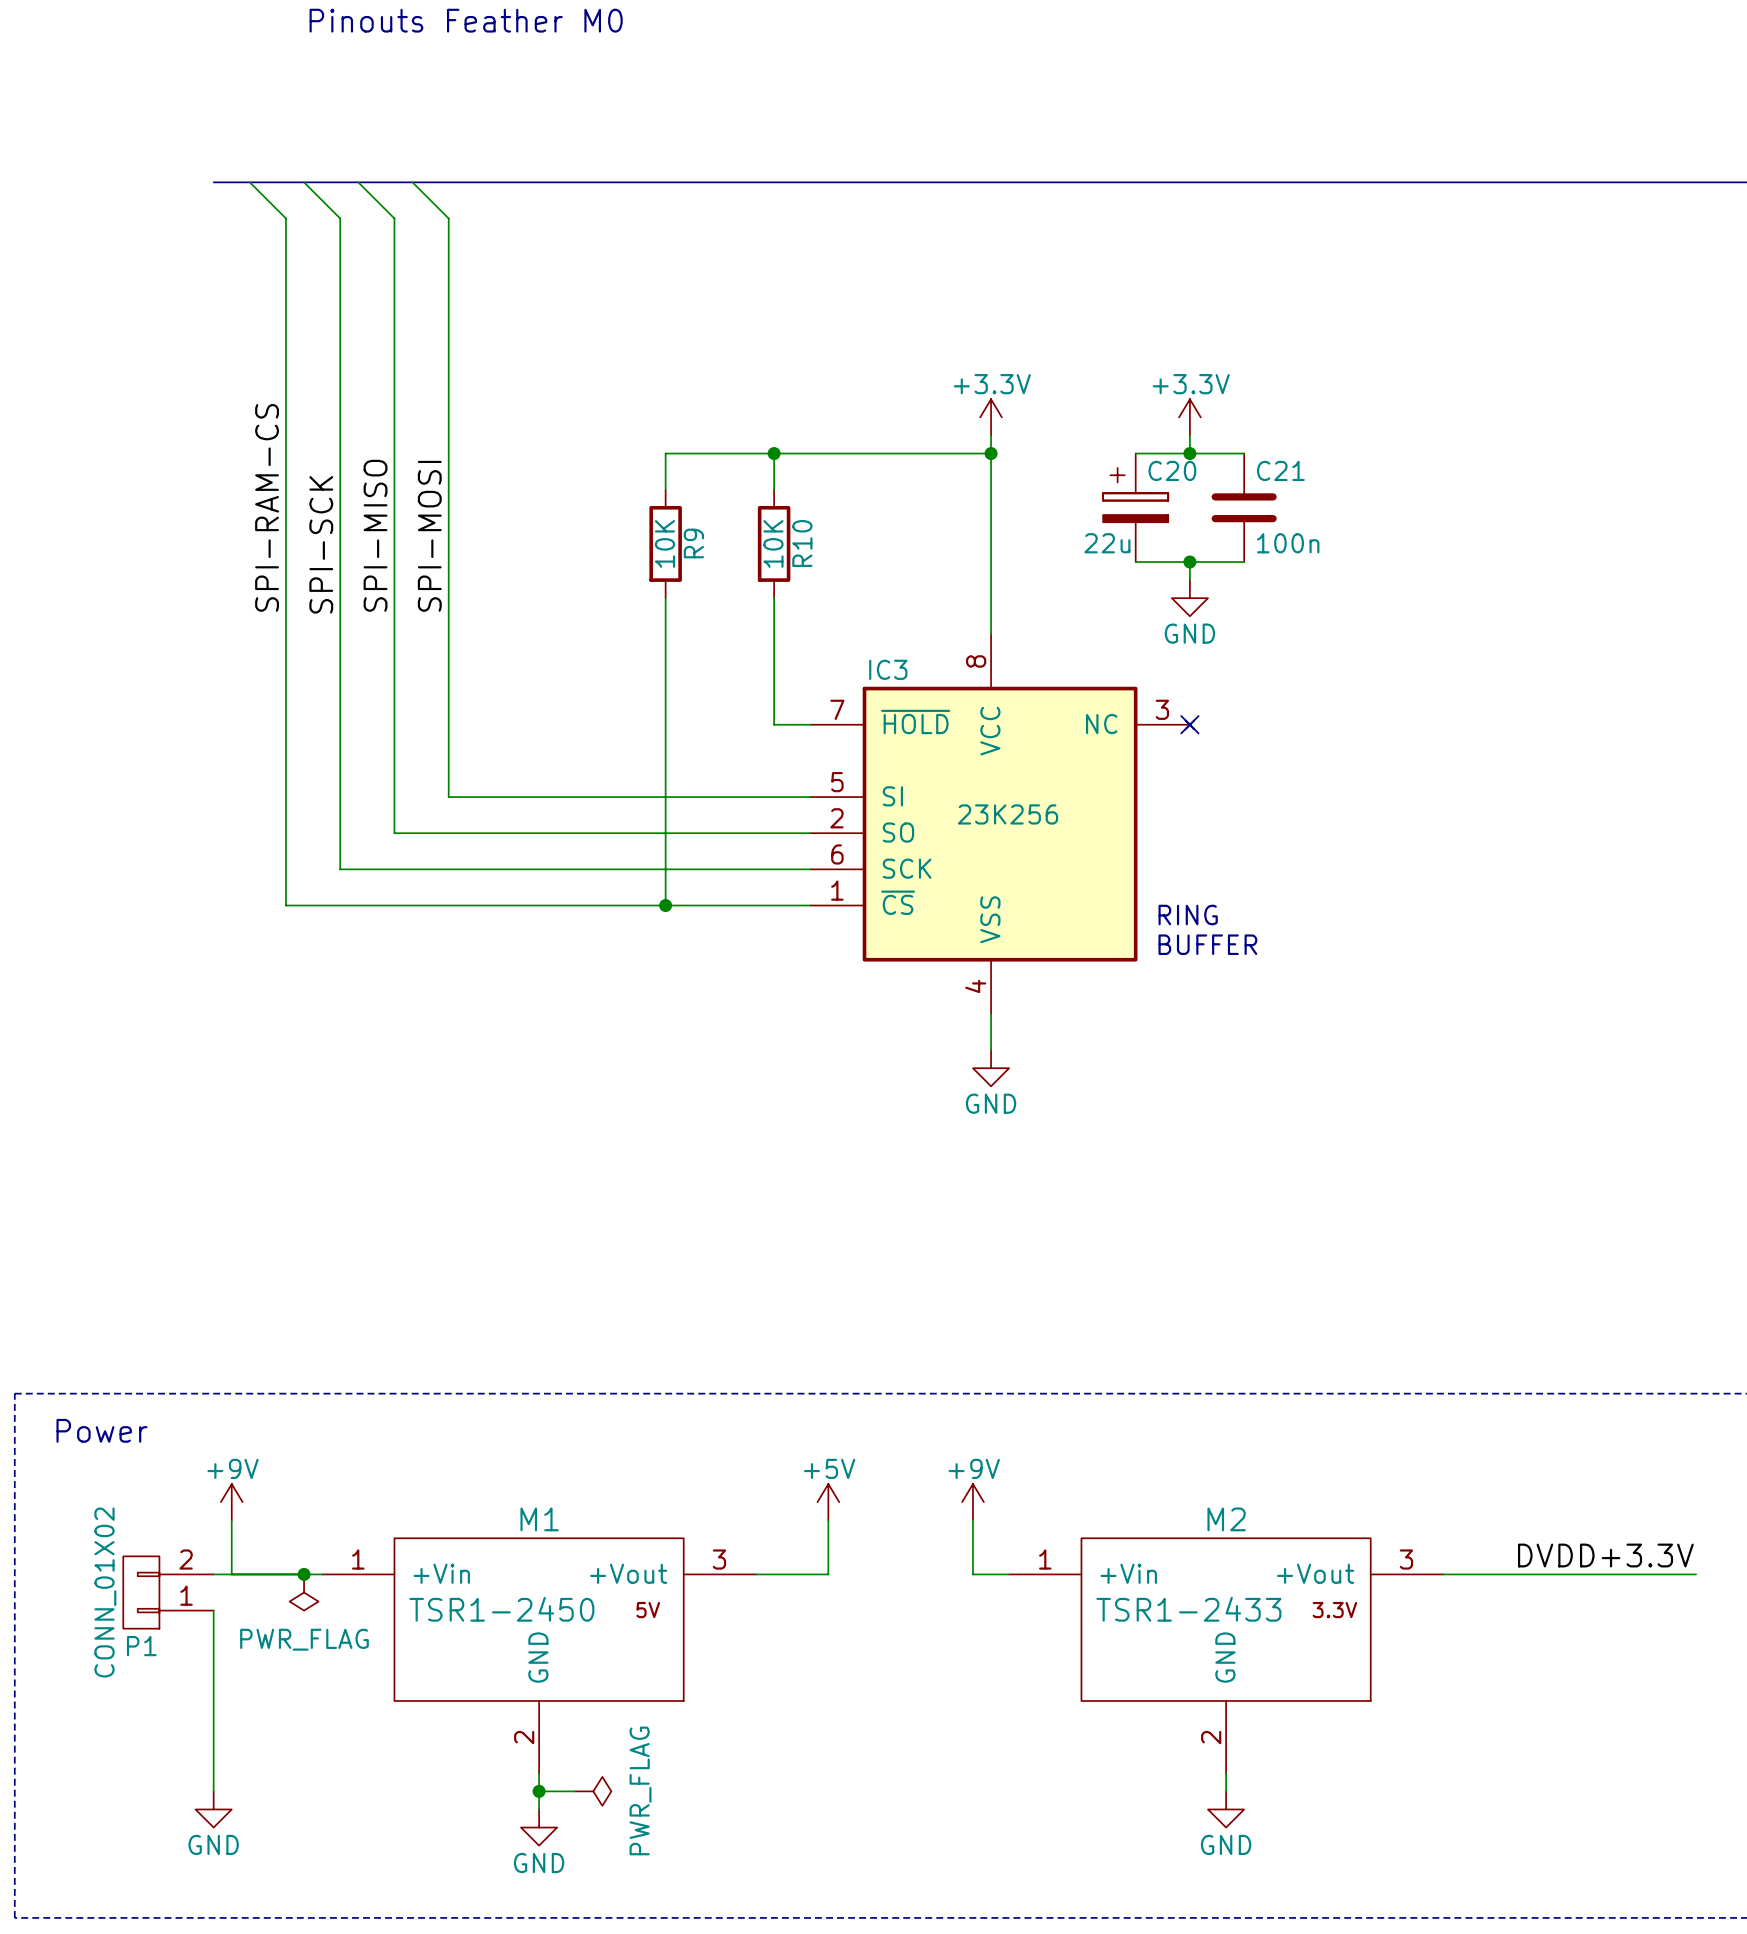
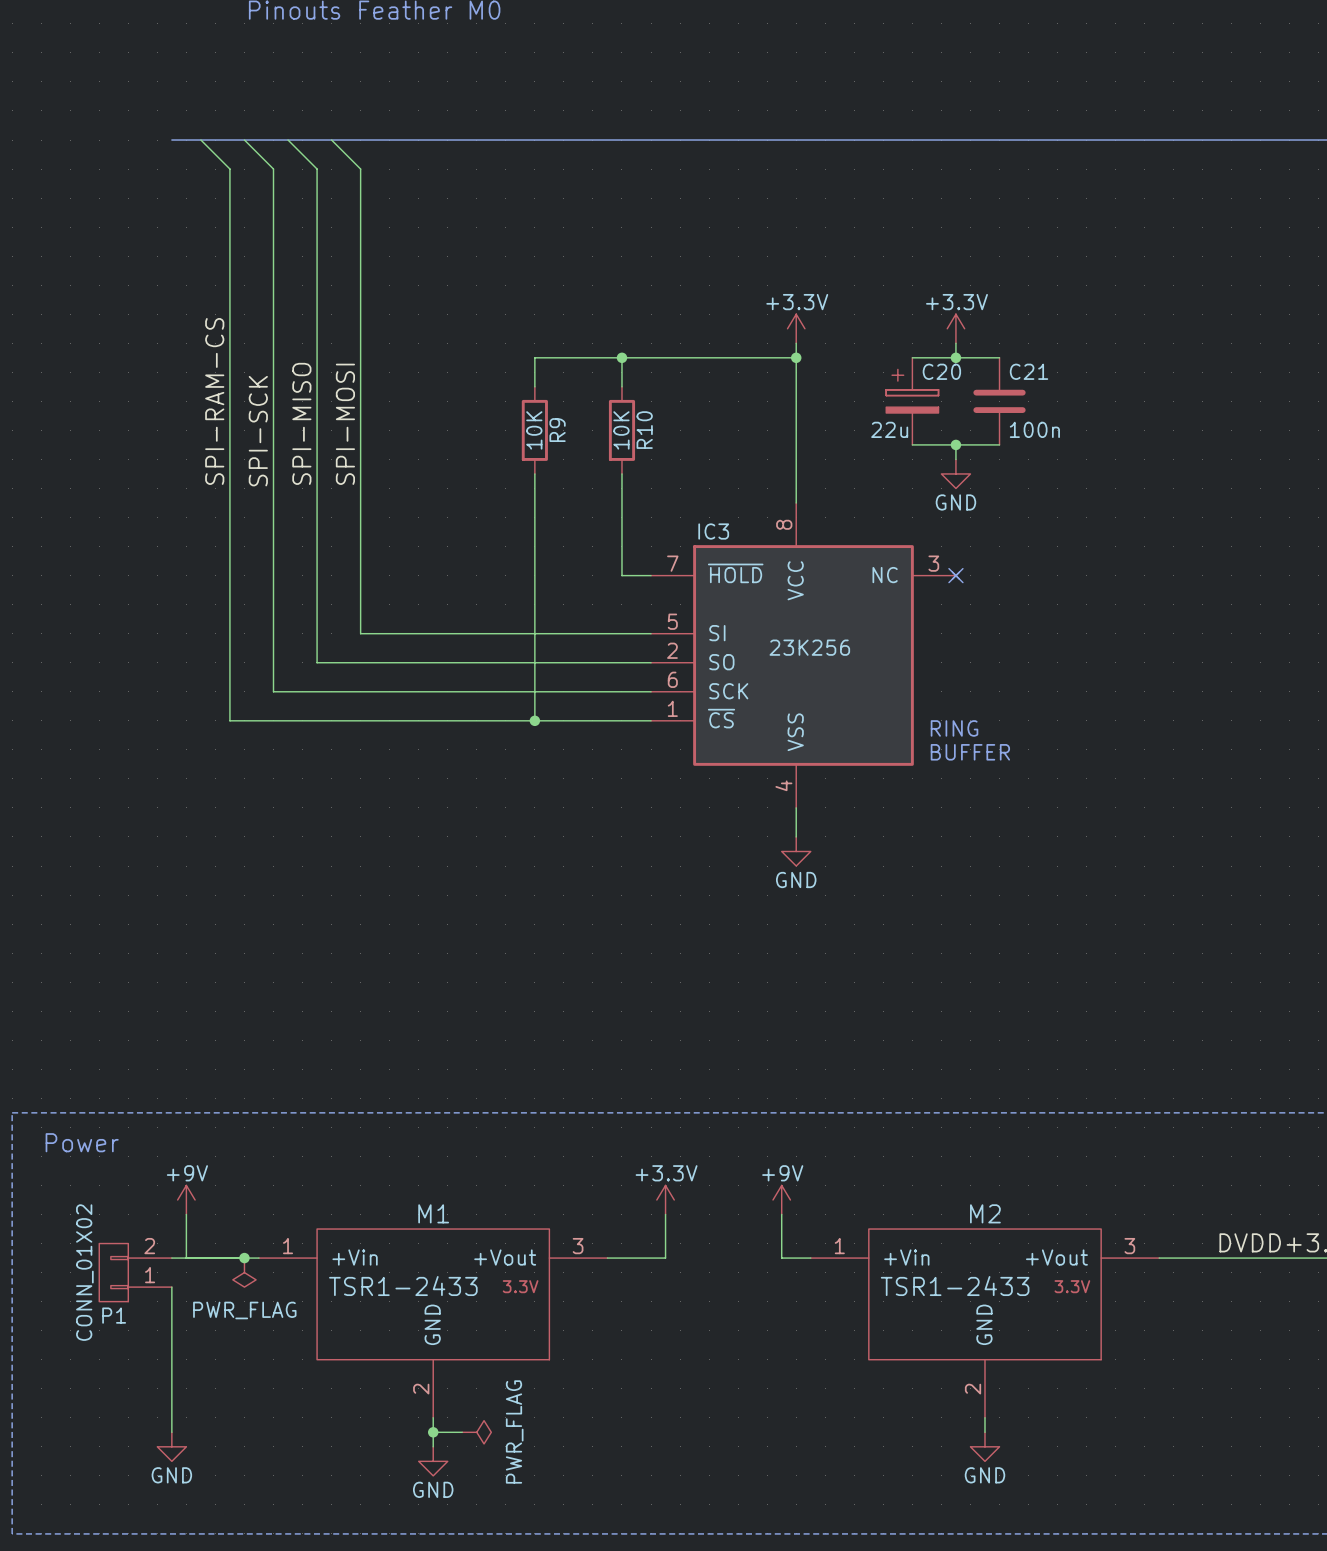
power symbol: +5V (828, 1502) -> +3.3V (665, 1199)
M1 value: TSR1-2450 (501, 1609) -> TSR1-2433 (403, 1286)
M1 text: 5V (648, 1610) -> 3.3V (520, 1286)

